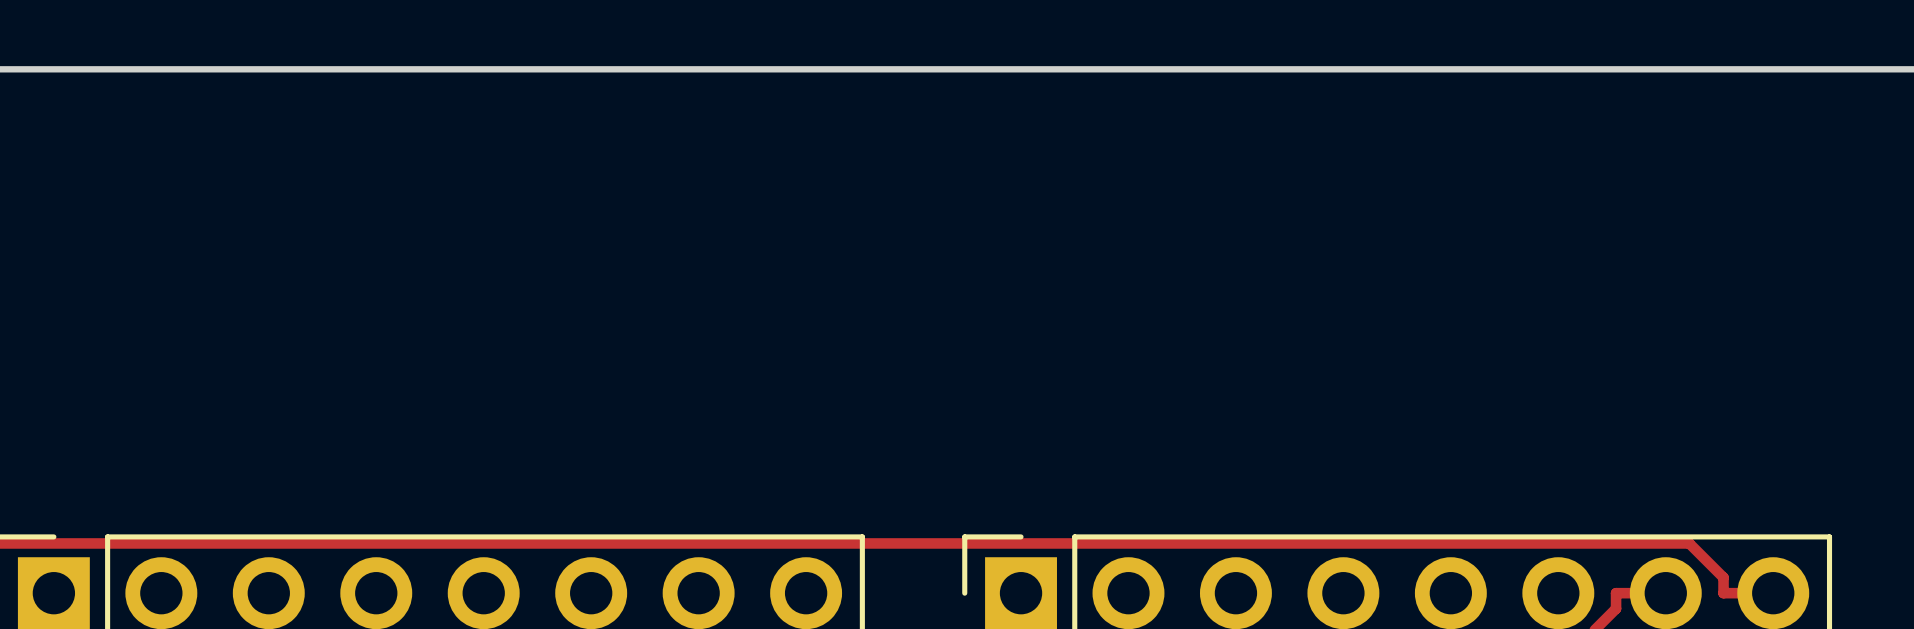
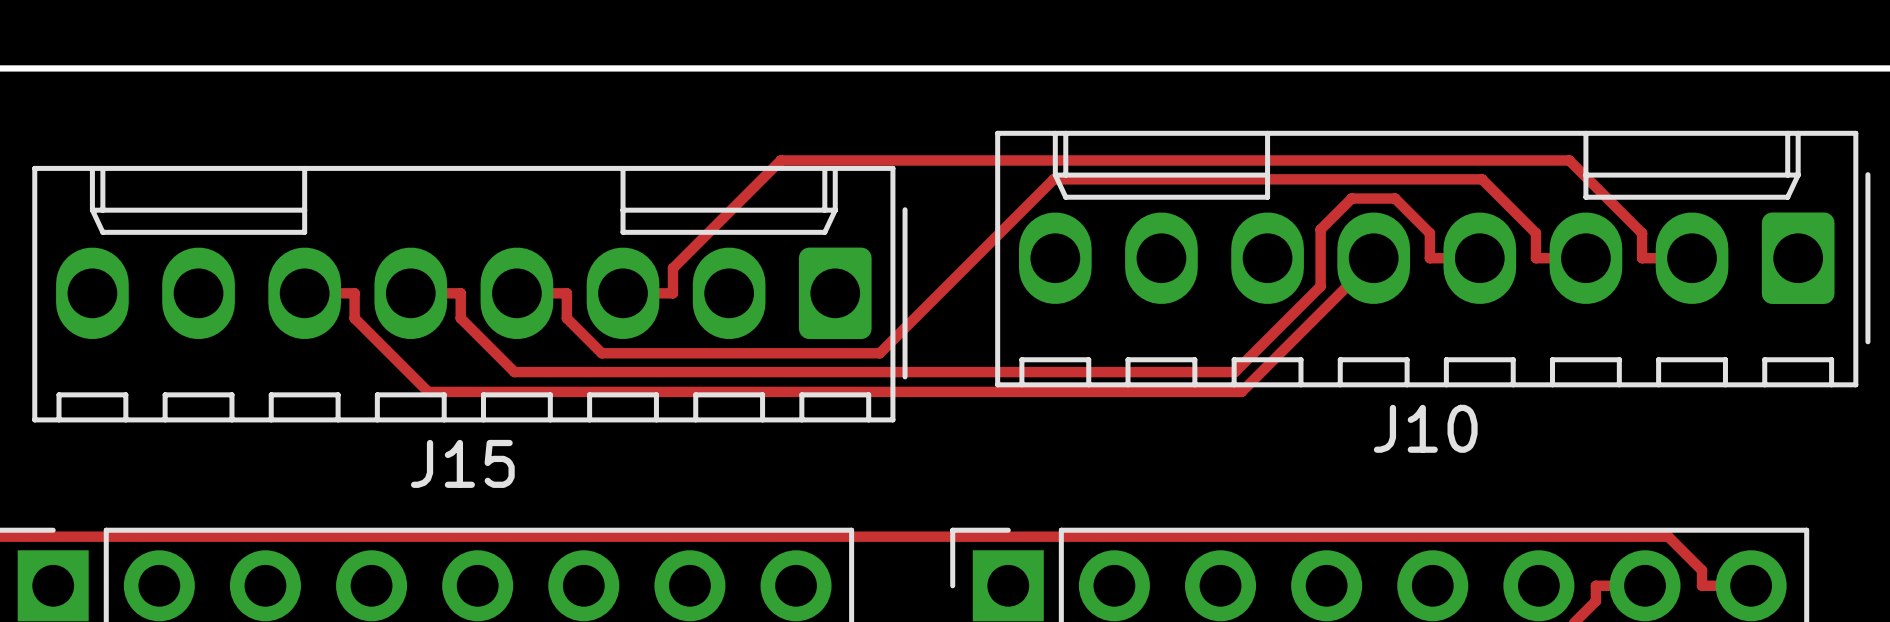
track: none -> (1373, 258) (1241, 391) (428, 391) (354, 318) (354, 293) (304, 293)
track: none -> (1479, 258) (1429, 258) (1429, 233) (1395, 198) (1351, 198) (1320, 229) (1320, 286) (1234, 372) (514, 372) (460, 318) (460, 293) (410, 293)
track: none -> (1585, 258) (1535, 258) (1535, 233) (1482, 179) (1053, 179) (879, 353) (601, 353) (566, 318) (566, 293) (516, 293)
track: none -> (1692, 258) (1642, 258) (1642, 233) (1569, 160) (780, 160) (672, 268) (672, 293) (623, 293)
J10: none -> (1432, 259)
J15: none -> (469, 294)

